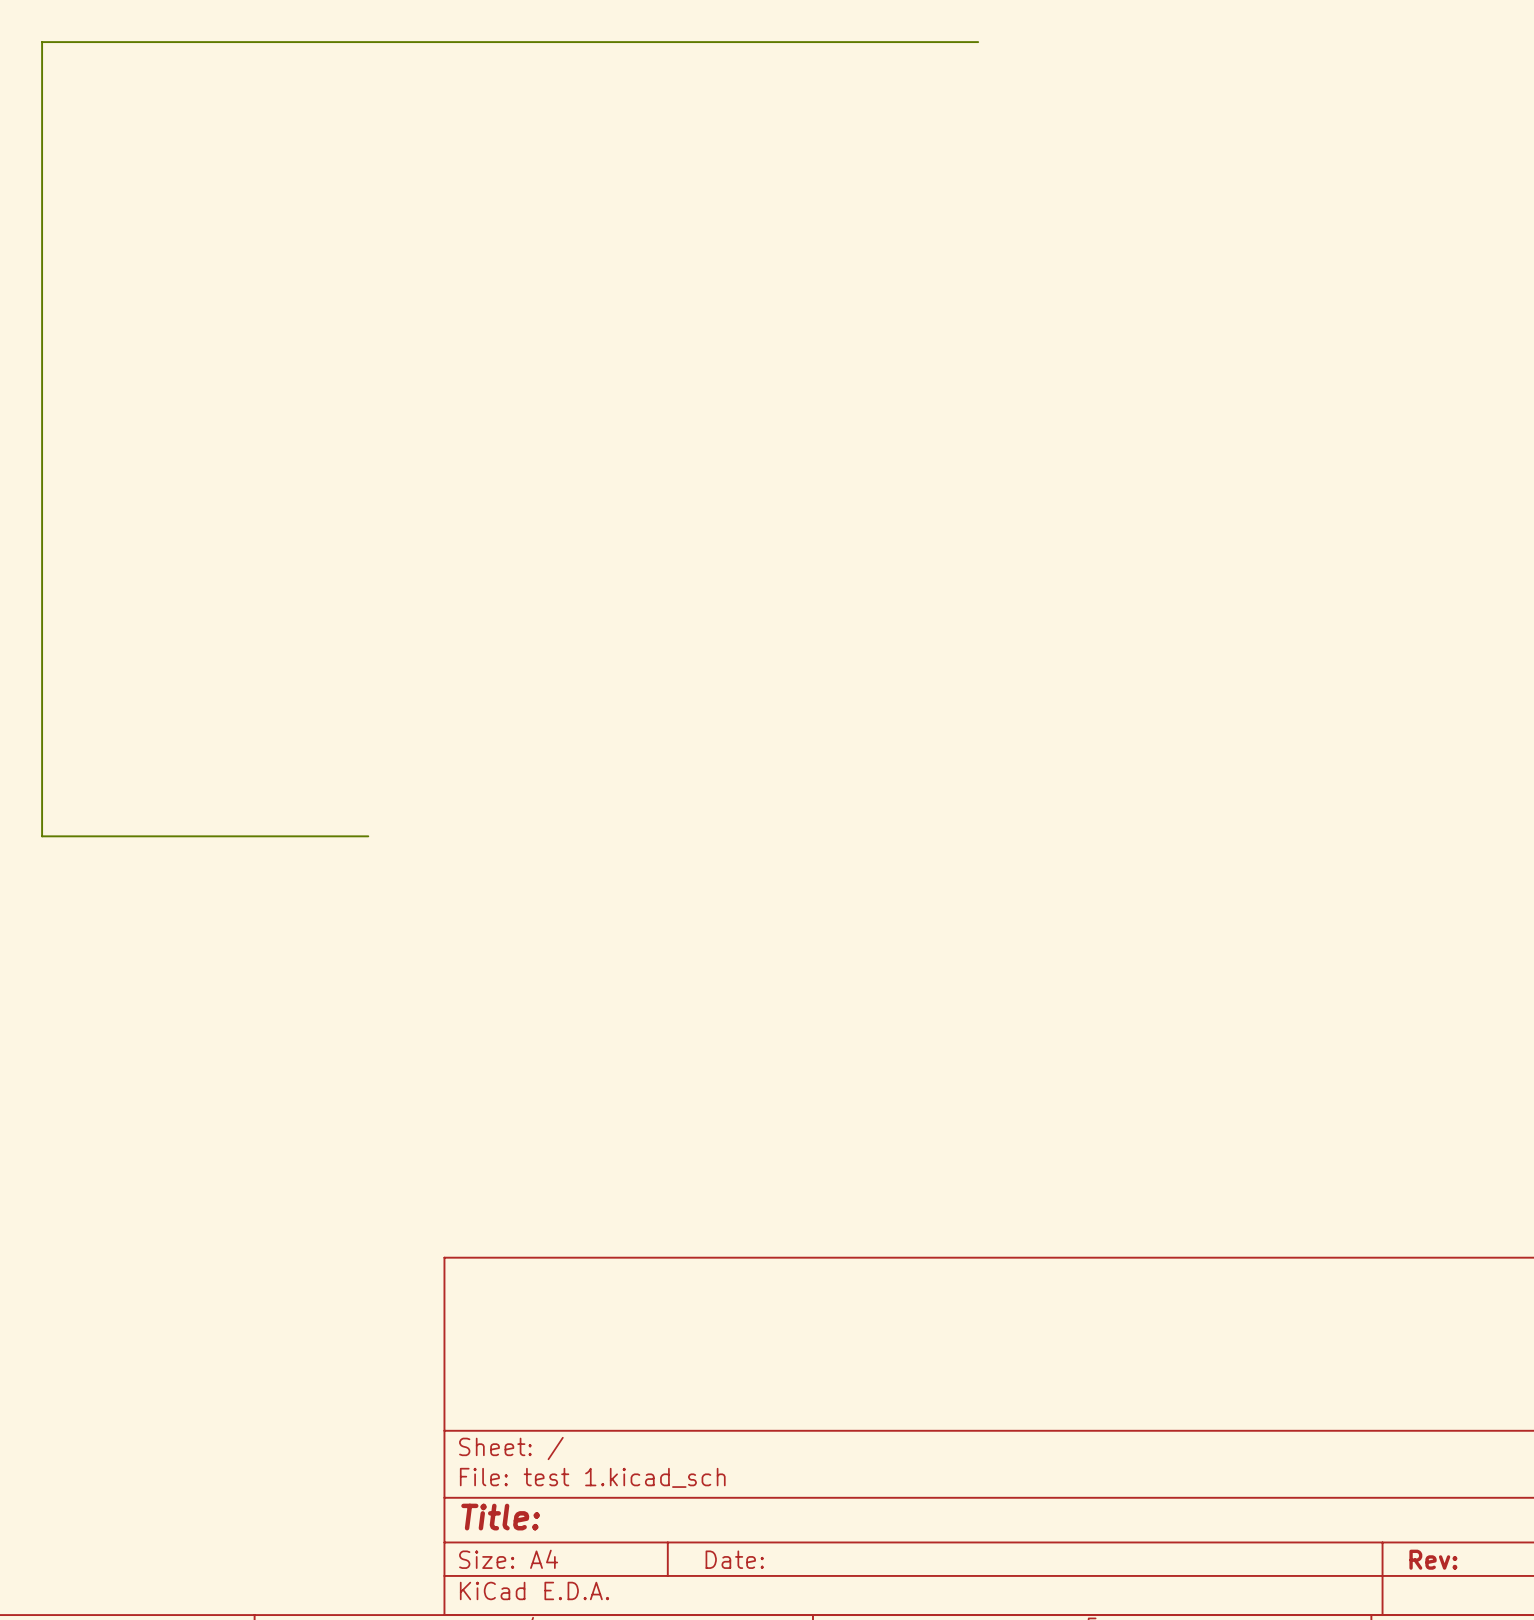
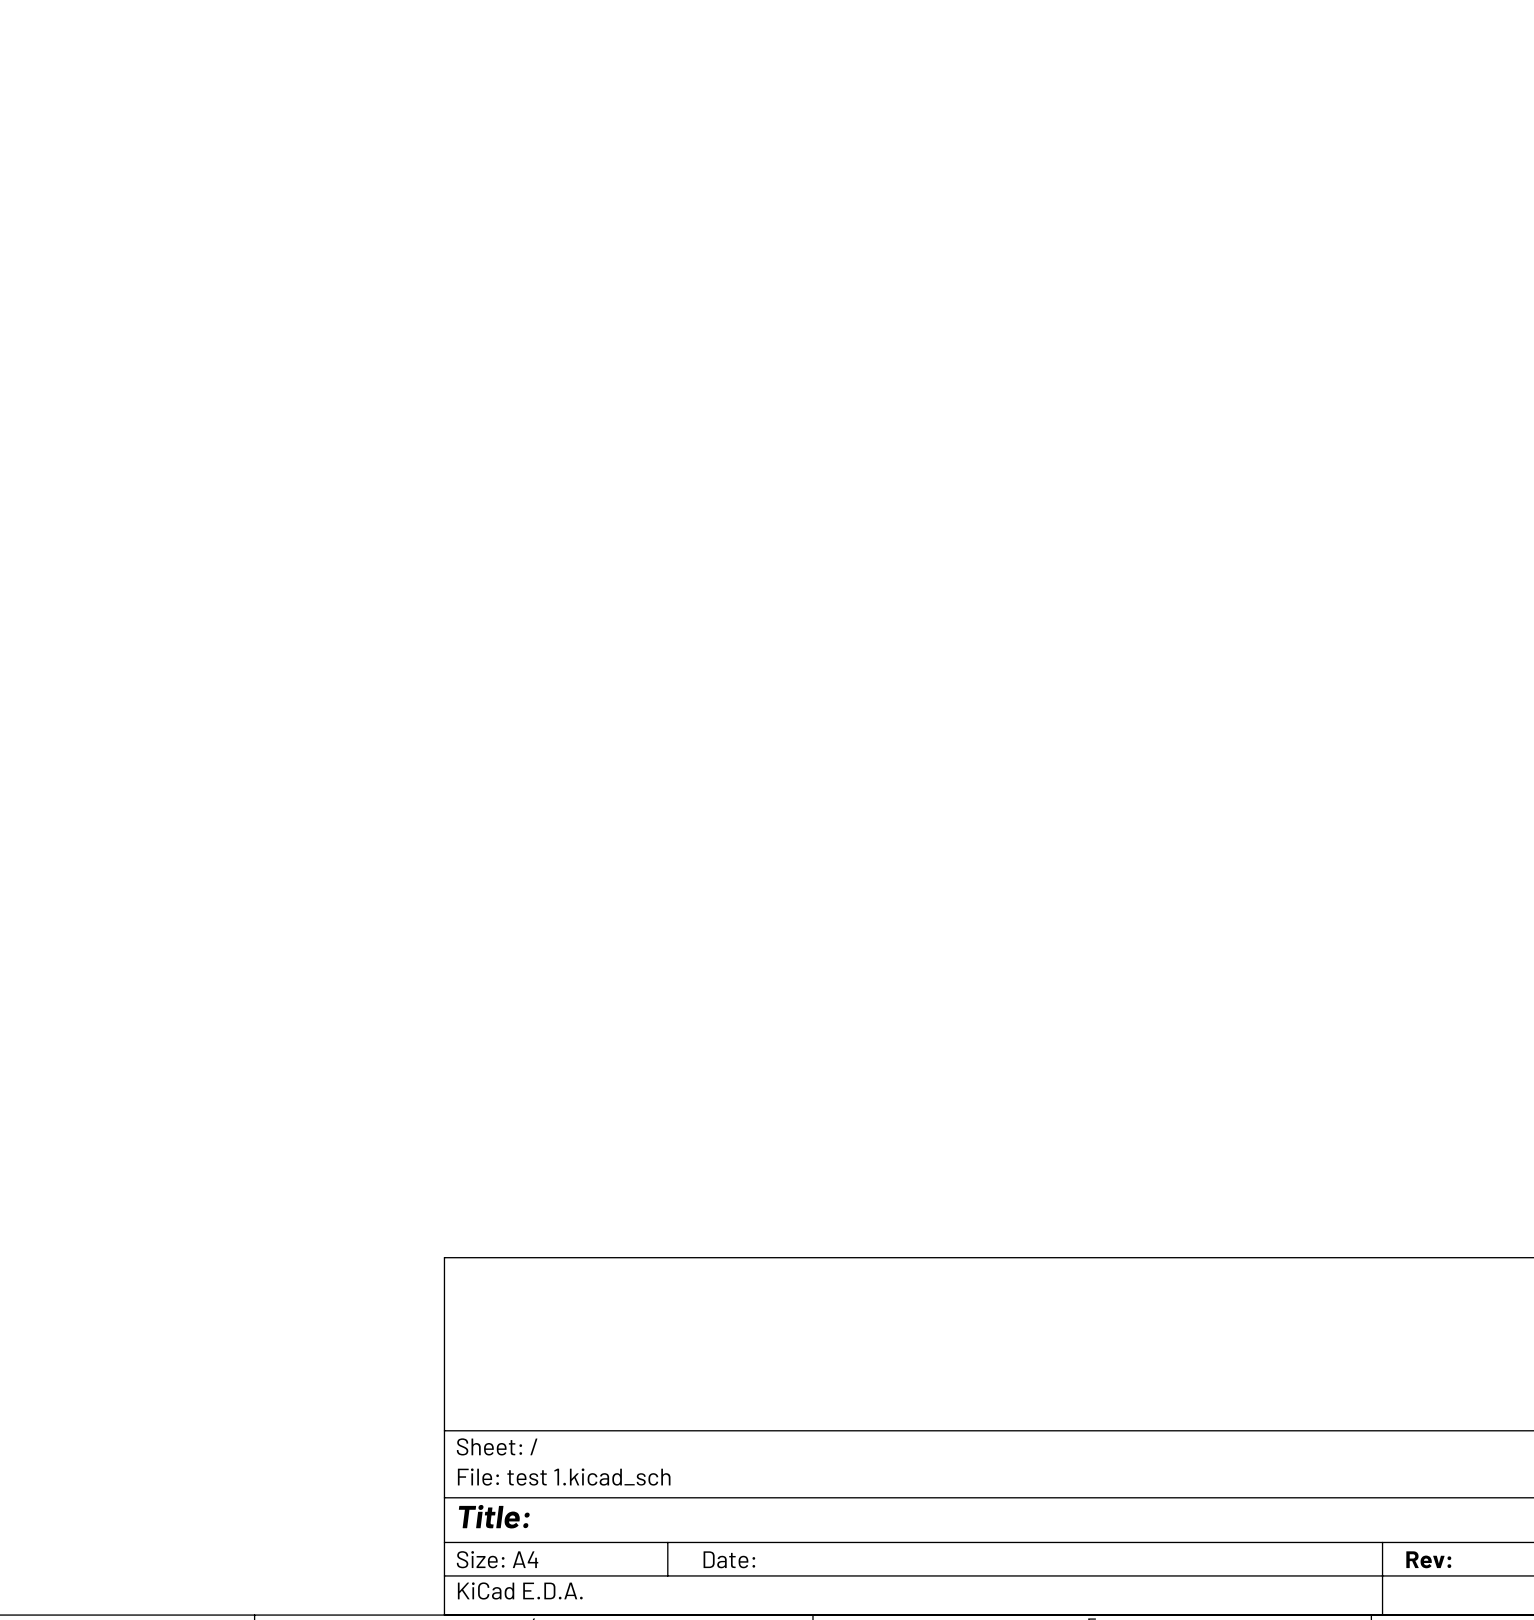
wire: (978, 42) (42, 42) (42, 836) (368, 836) -> none

